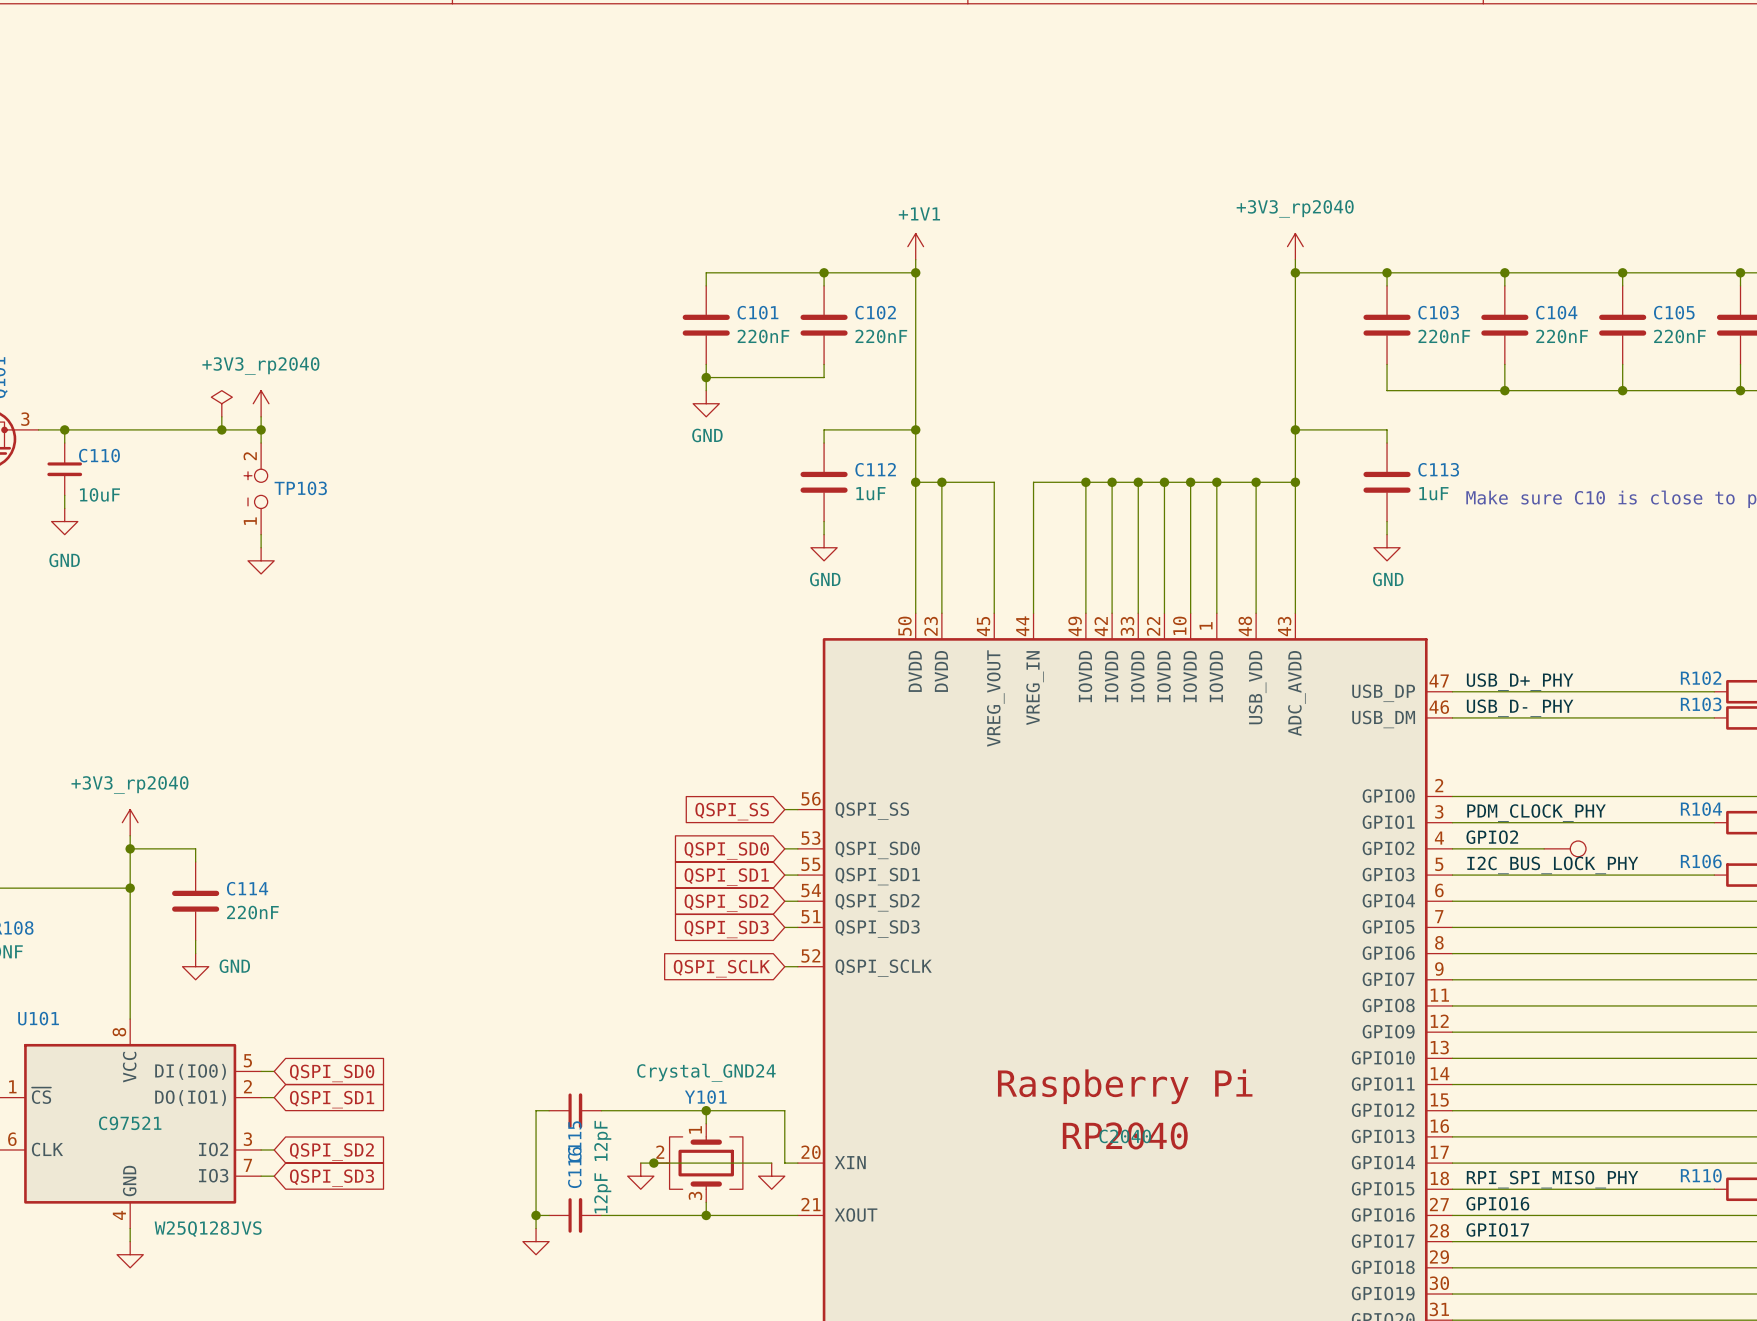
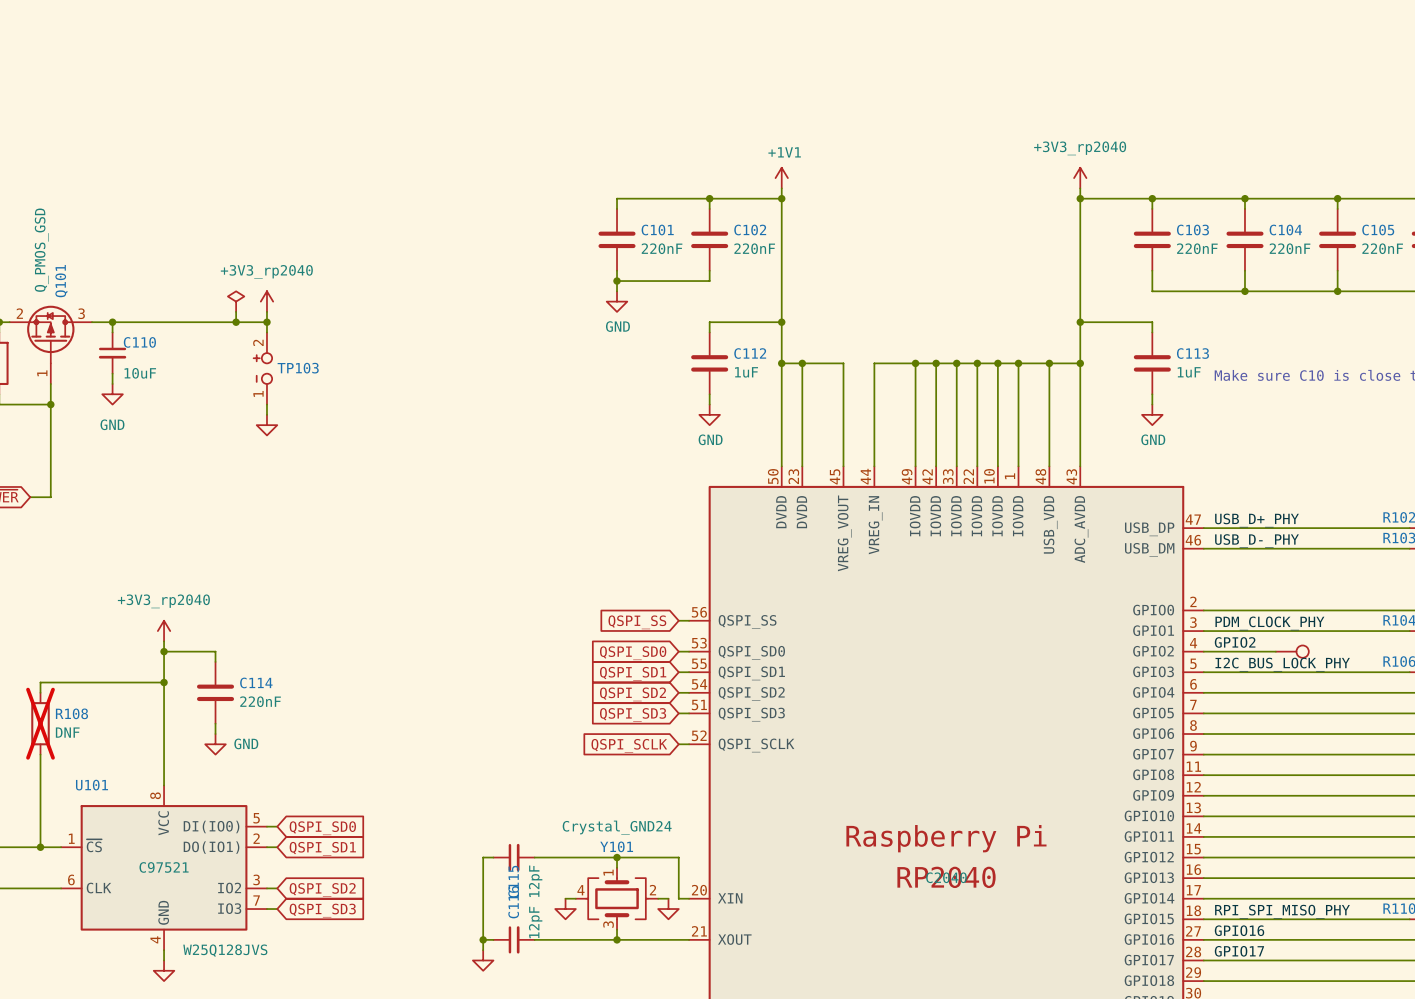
Y101 symbol: [653, 1123, 743, 1203] -> [575, 867, 659, 930]
wire: (653, 1163) (758, 1163) -> none
junction: (653, 1163) -> none

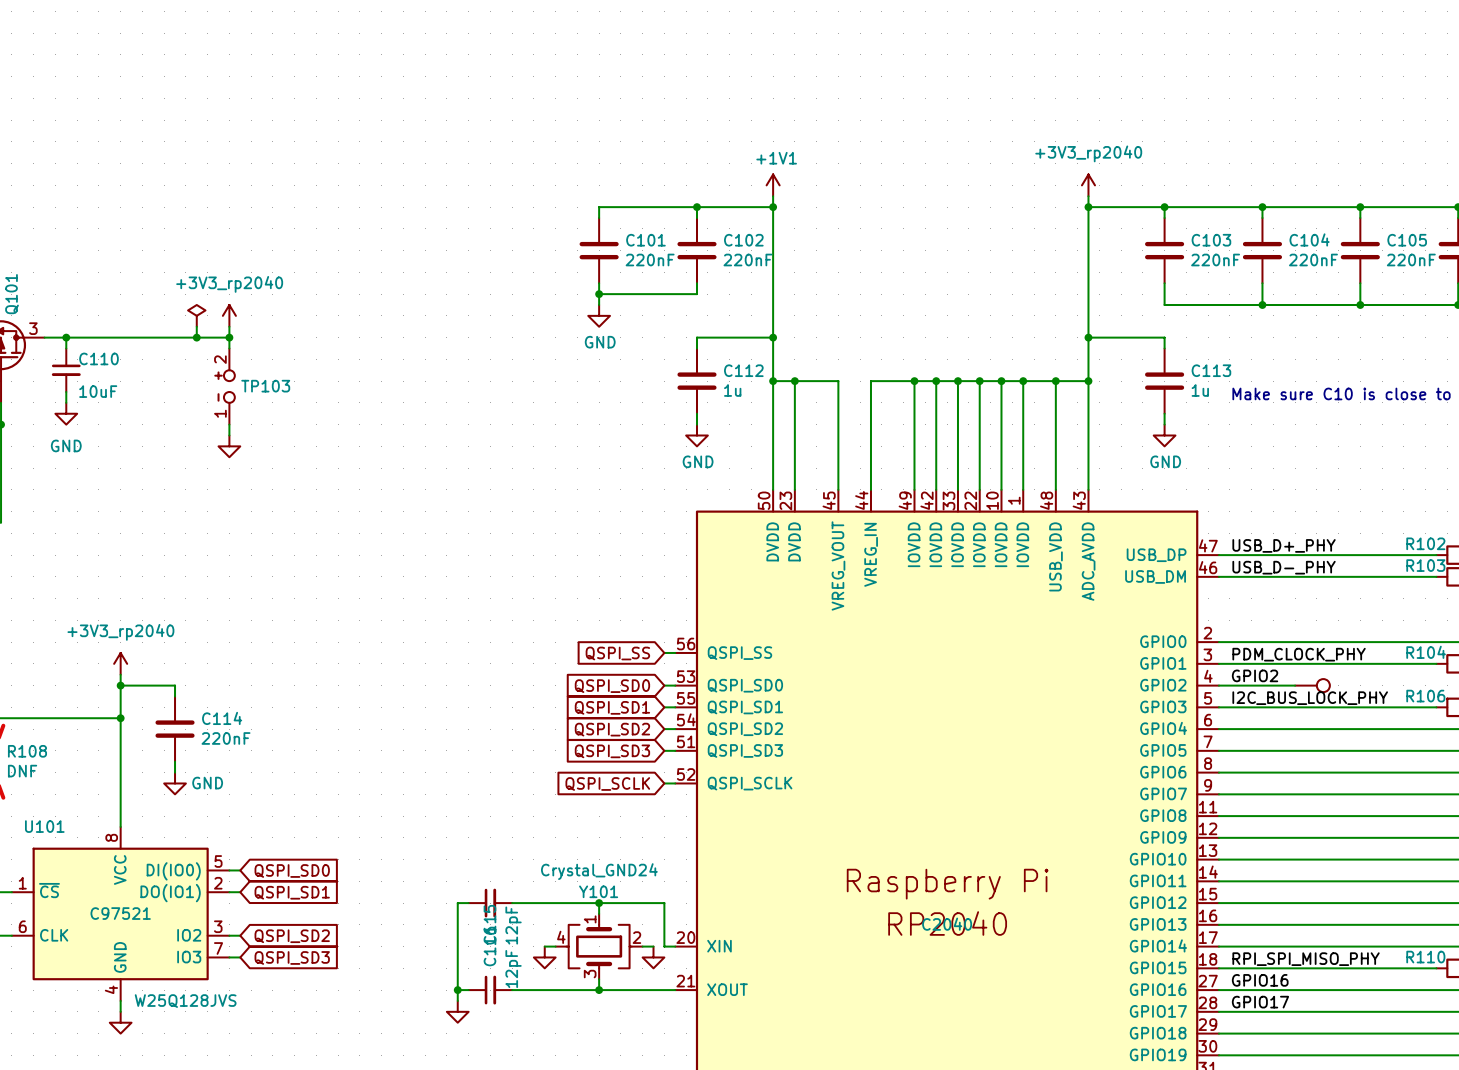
C112 value: 1uF (746, 372) -> 1u (732, 390)
C113 value: 1uF (1189, 372) -> 1u (1200, 390)

